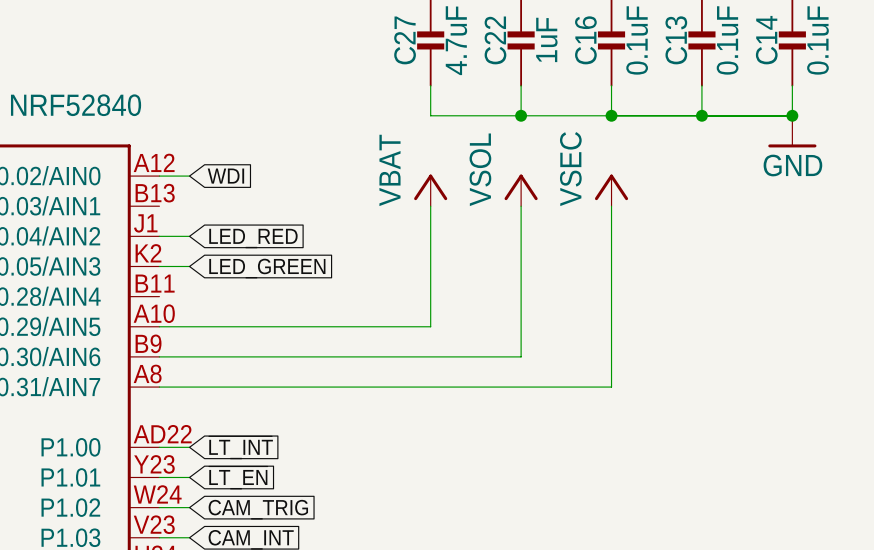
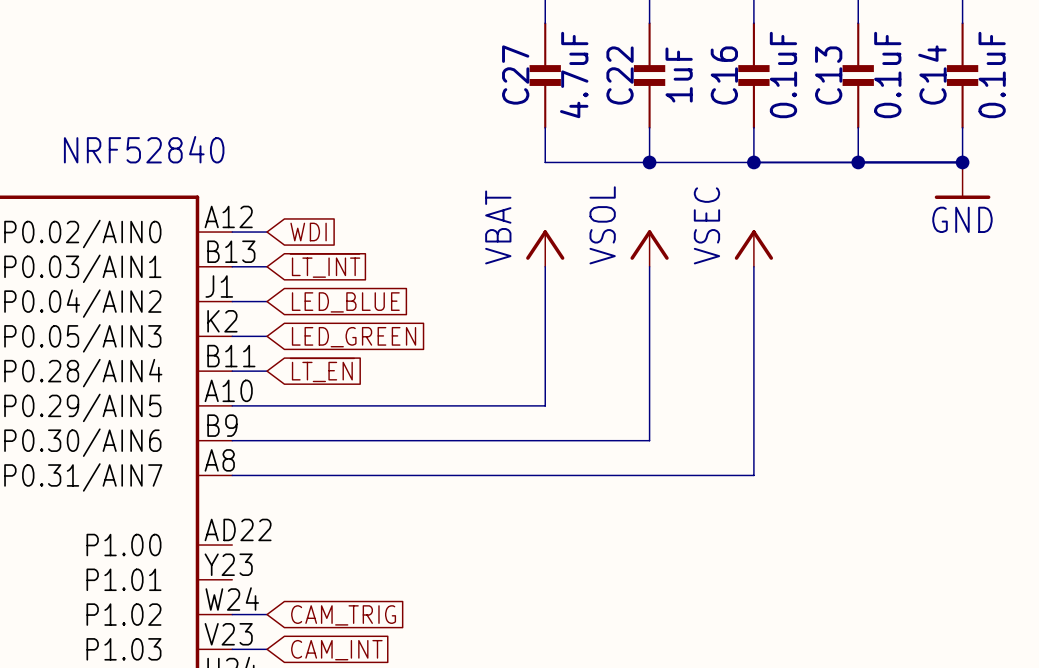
global label: LED_RED (253, 238) -> LED_BLUE (345, 302)
wire: (159, 447) (189, 447) -> (232, 371) (267, 371)
global label position: ~{LT_INT} (240, 447) -> ~{LT_INT} (324, 265)
wire: (159, 477) (189, 477) -> (232, 266) (267, 266)
global label position: ~{LT_EN} (238, 477) -> ~{LT_EN} (322, 369)

